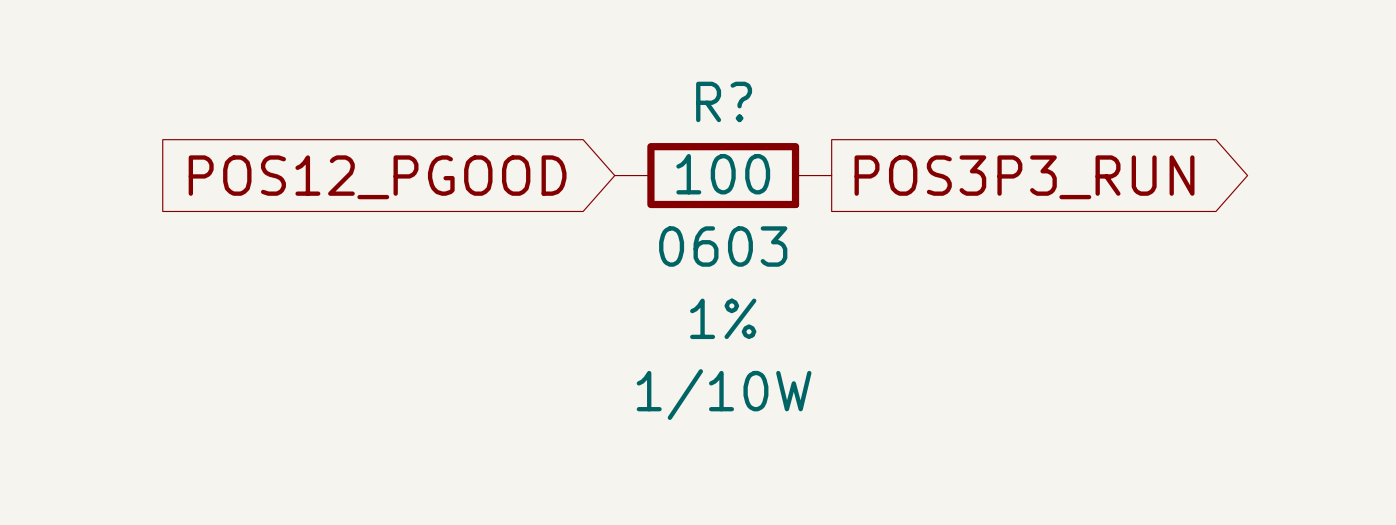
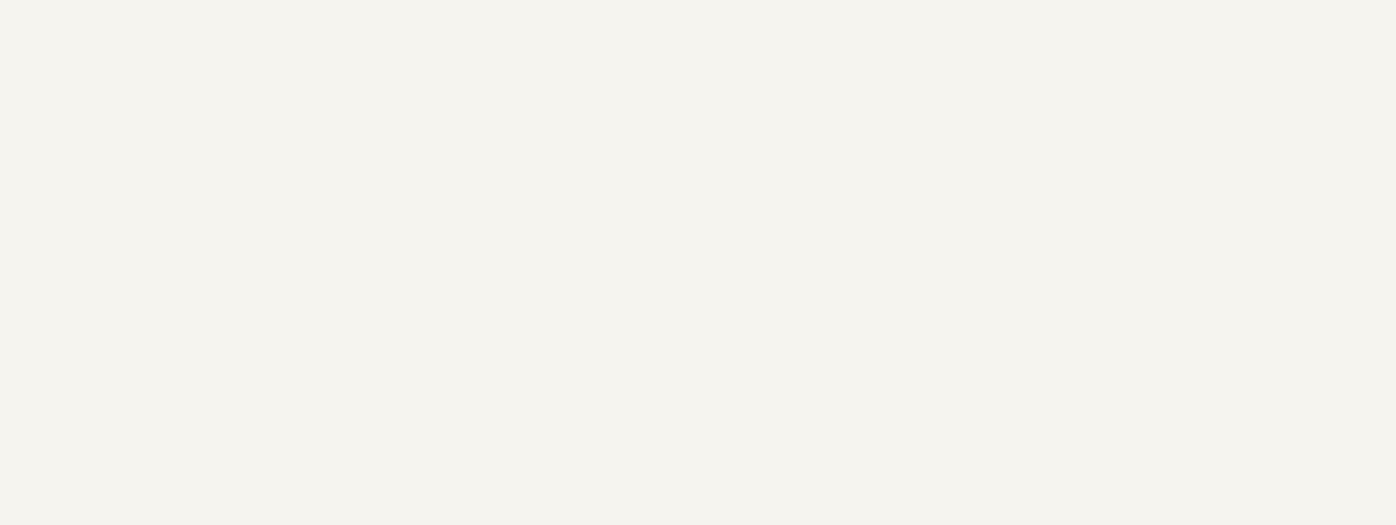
R?: 100 (723, 175) -> none
global label: POS12_PGOOD (377, 177) -> none
global label: POS3P3_RUN (1024, 177) -> none

